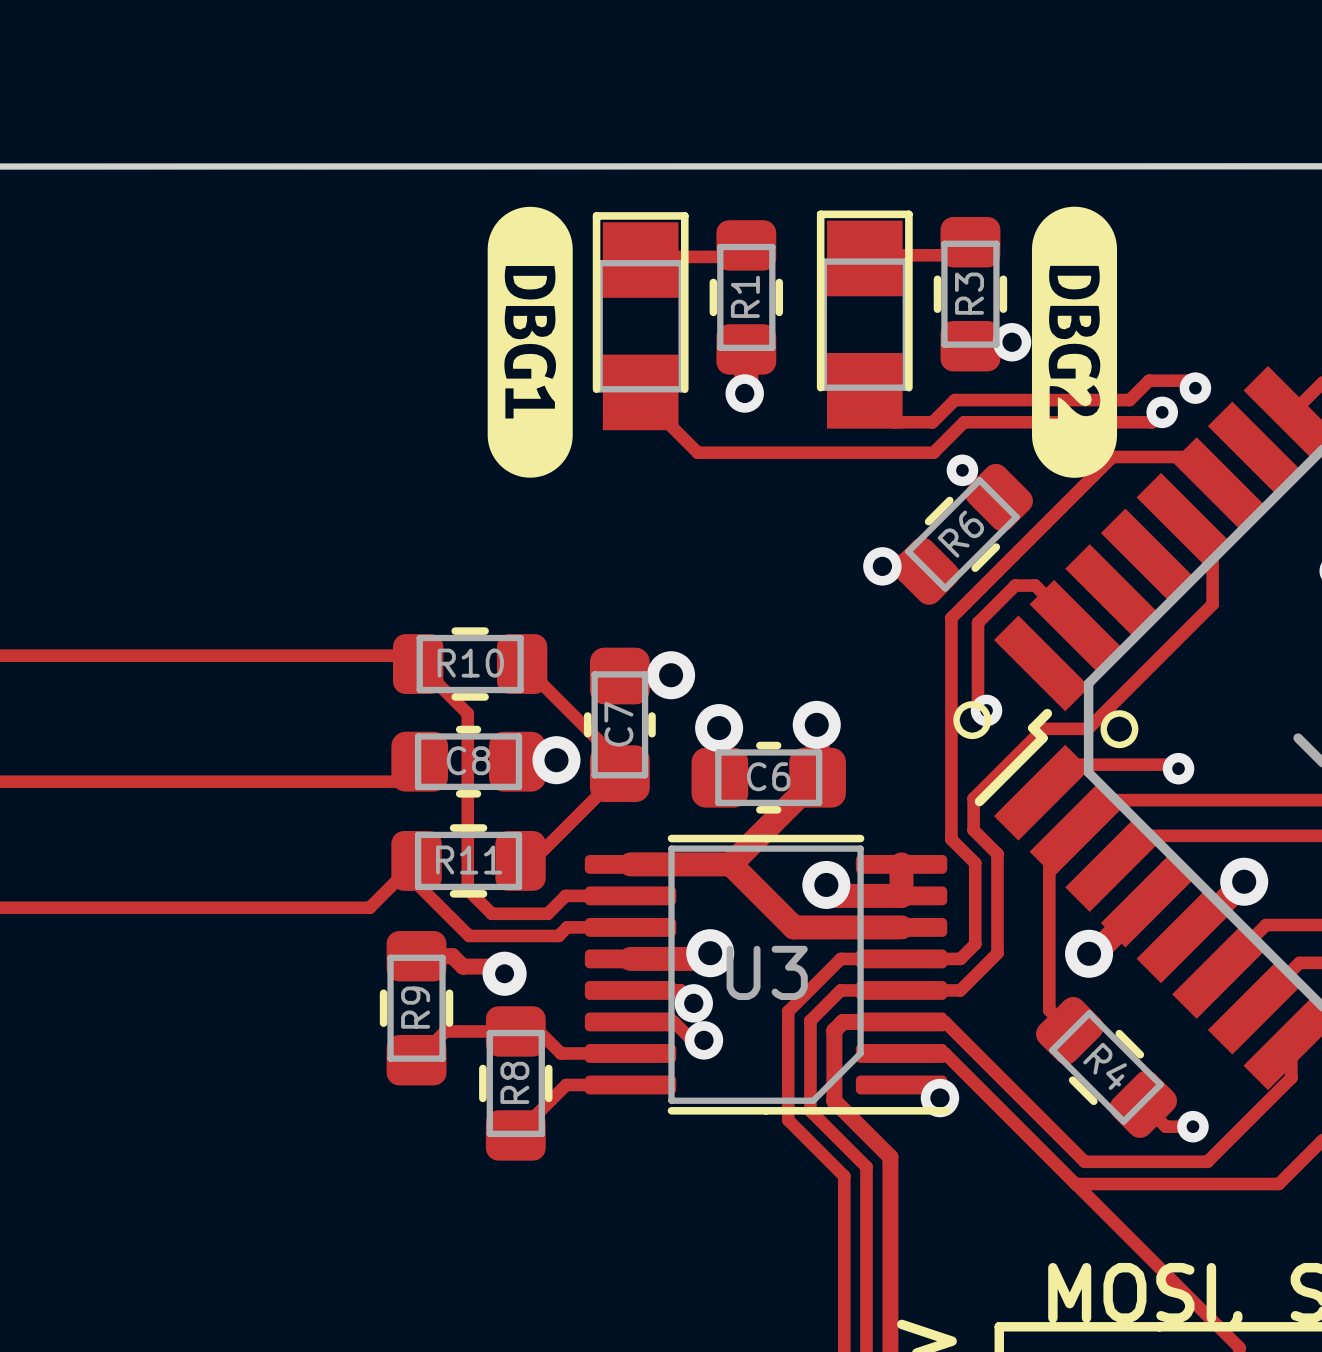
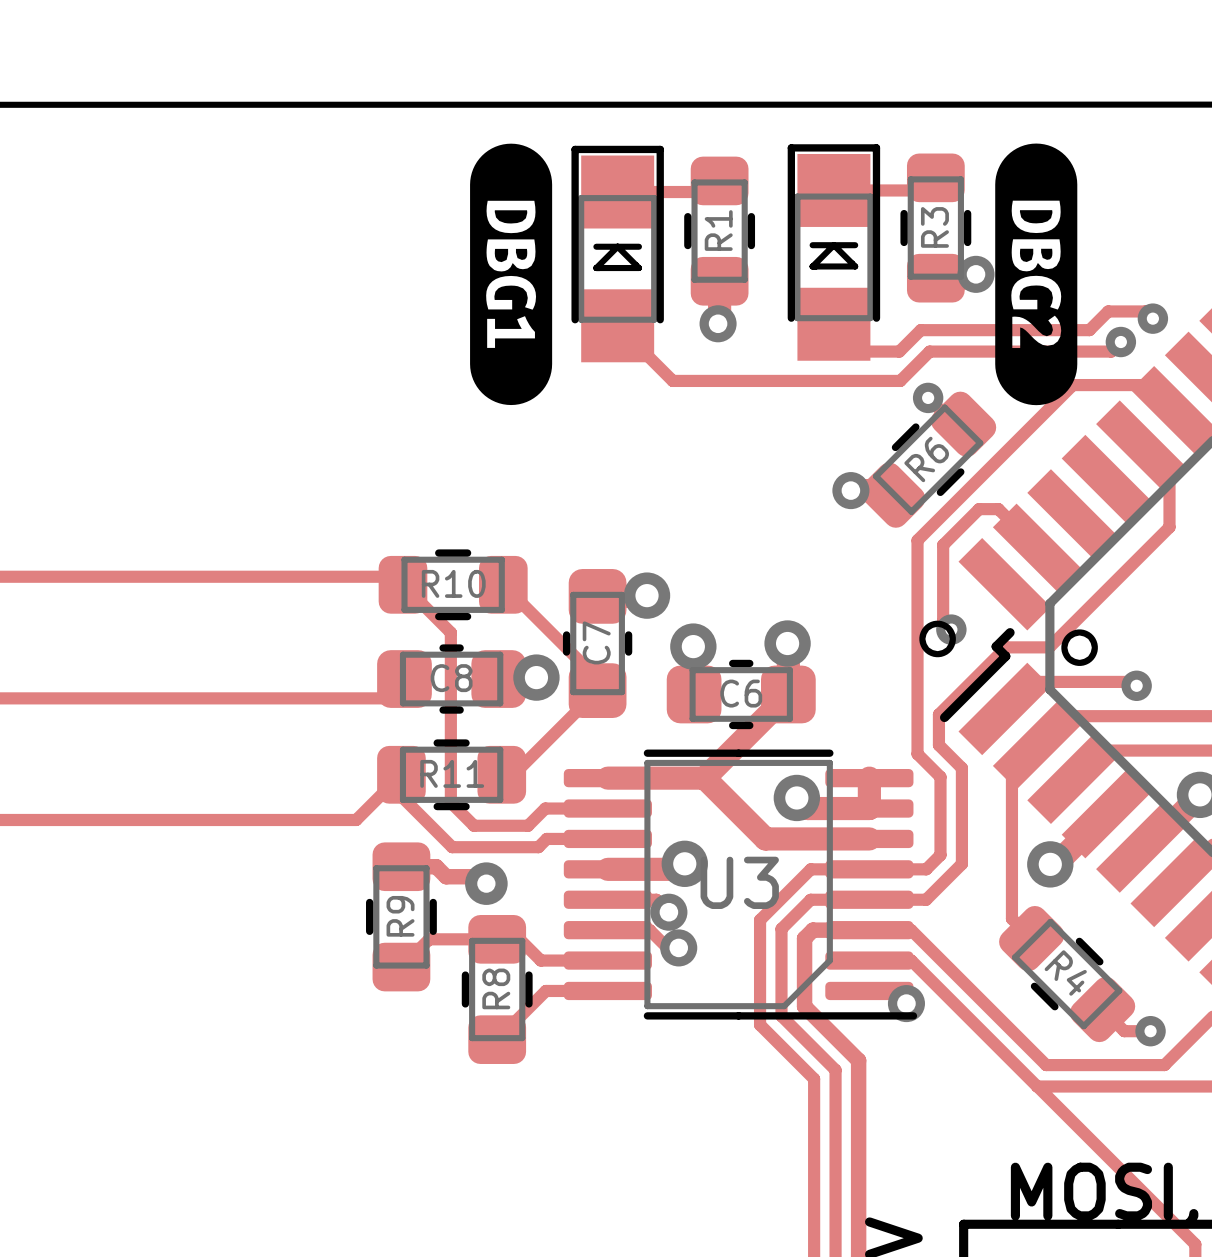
part footprint: [816, 210, 913, 429] -> [787, 144, 881, 361]
part footprint: [592, 212, 689, 431] -> [571, 145, 664, 363]

